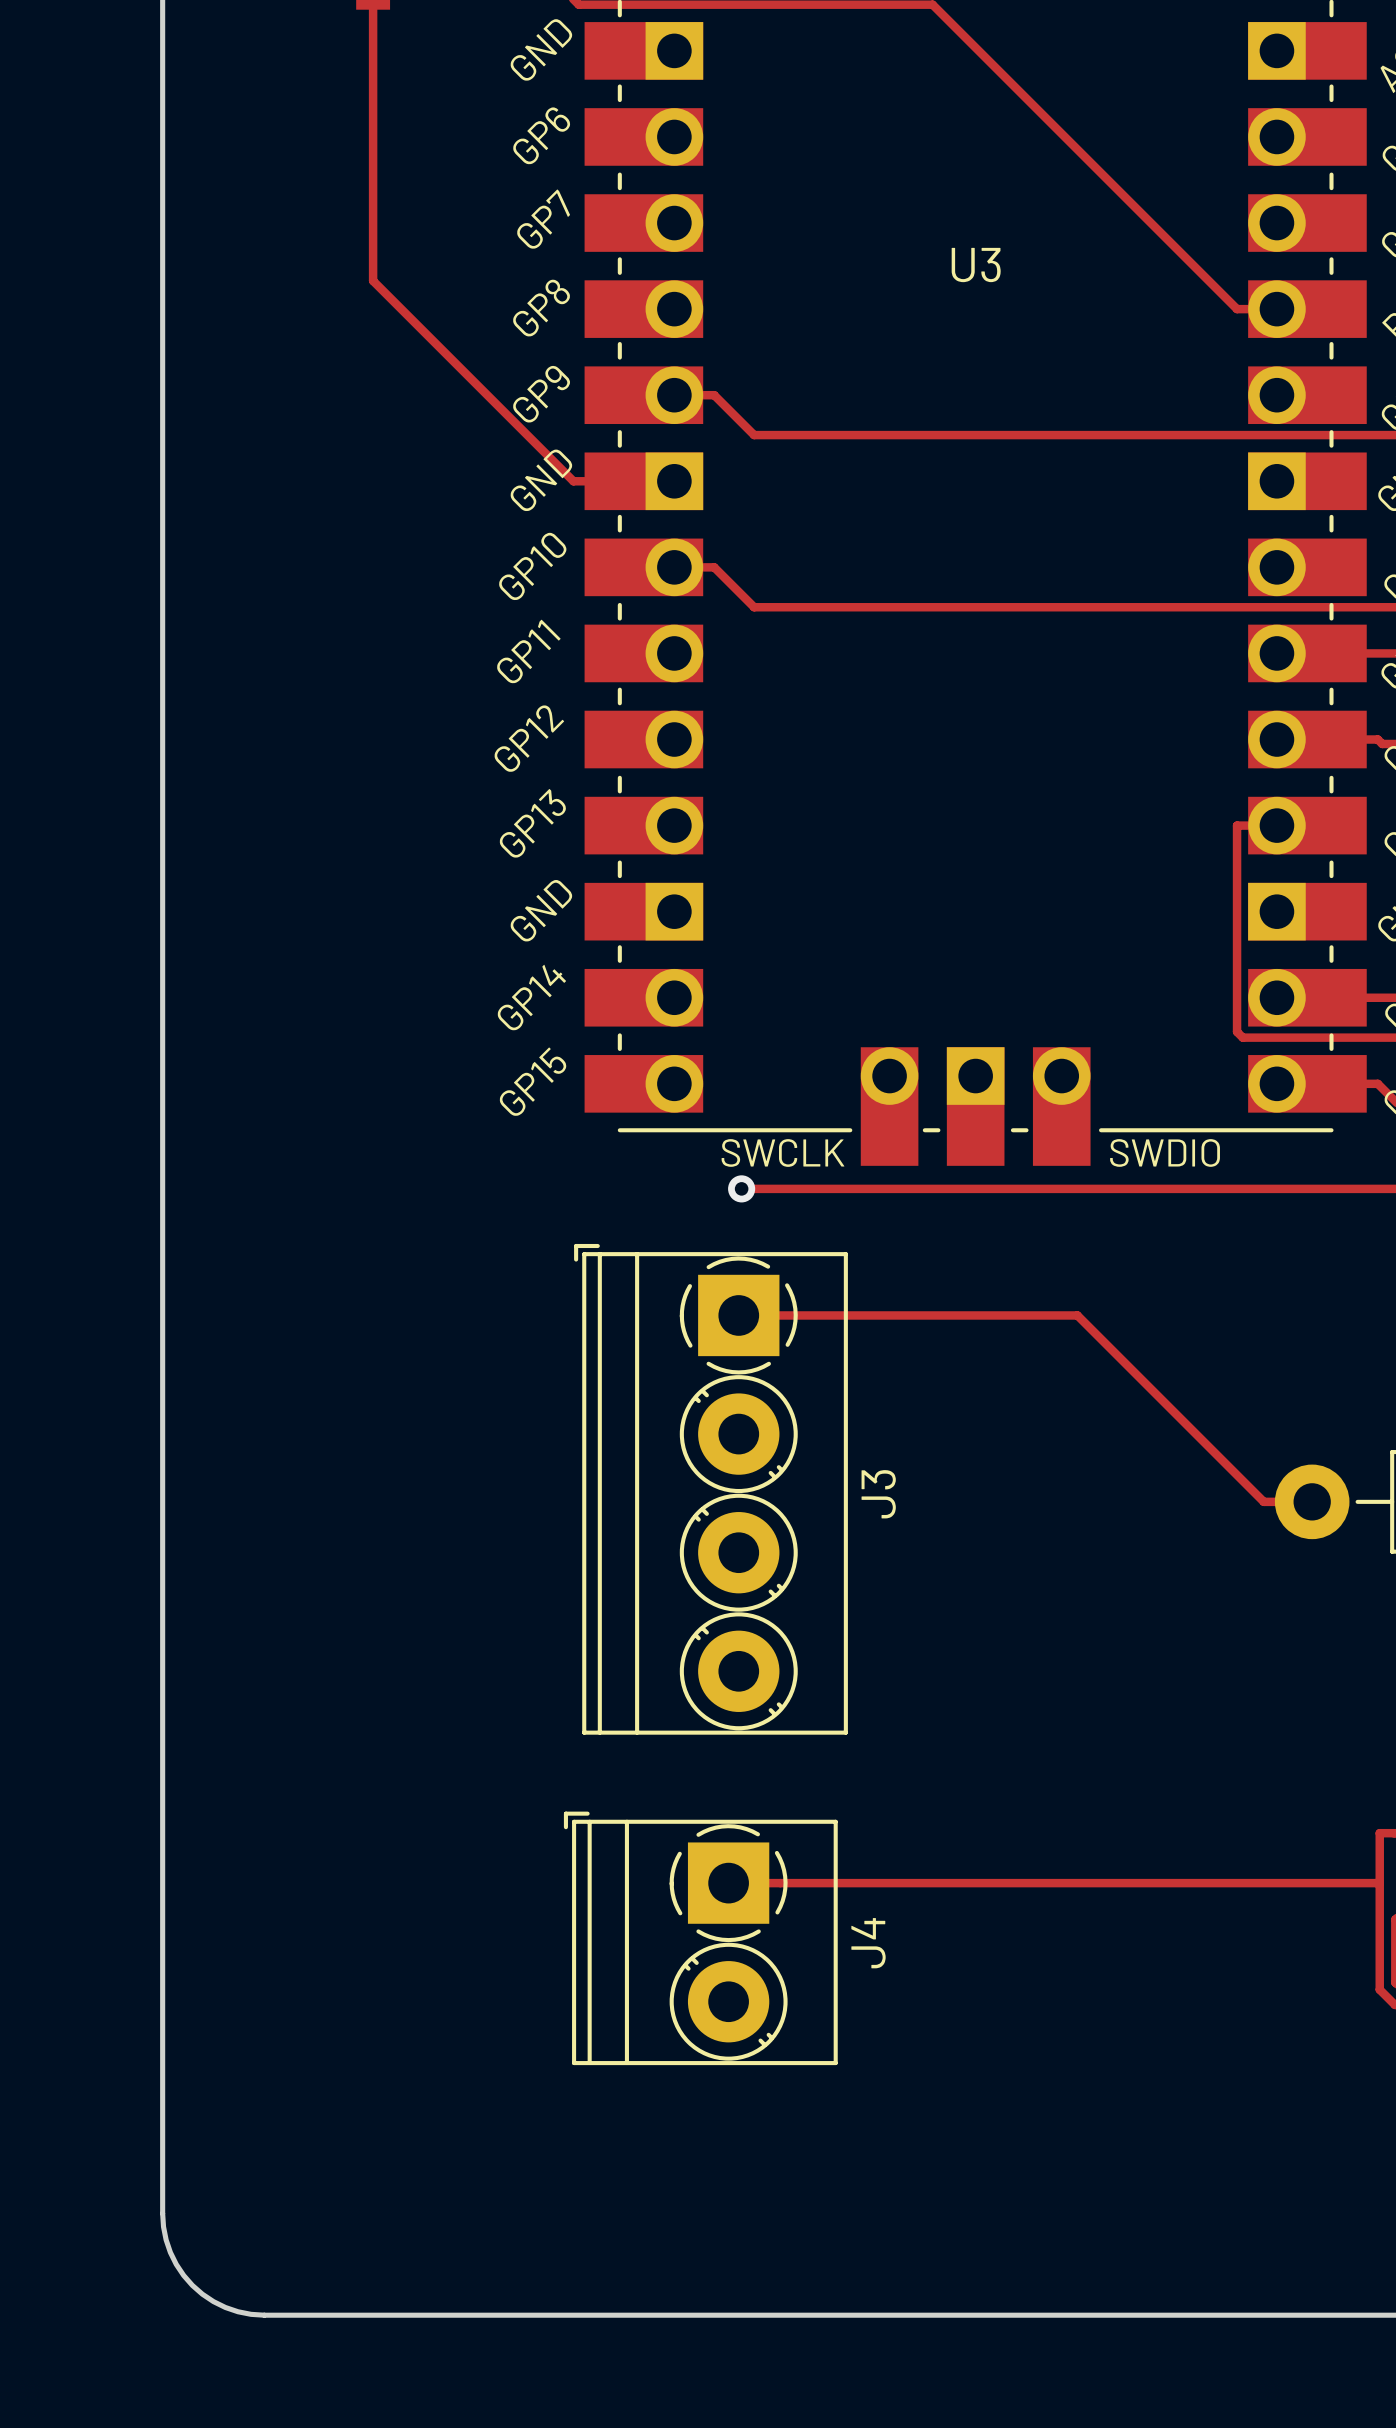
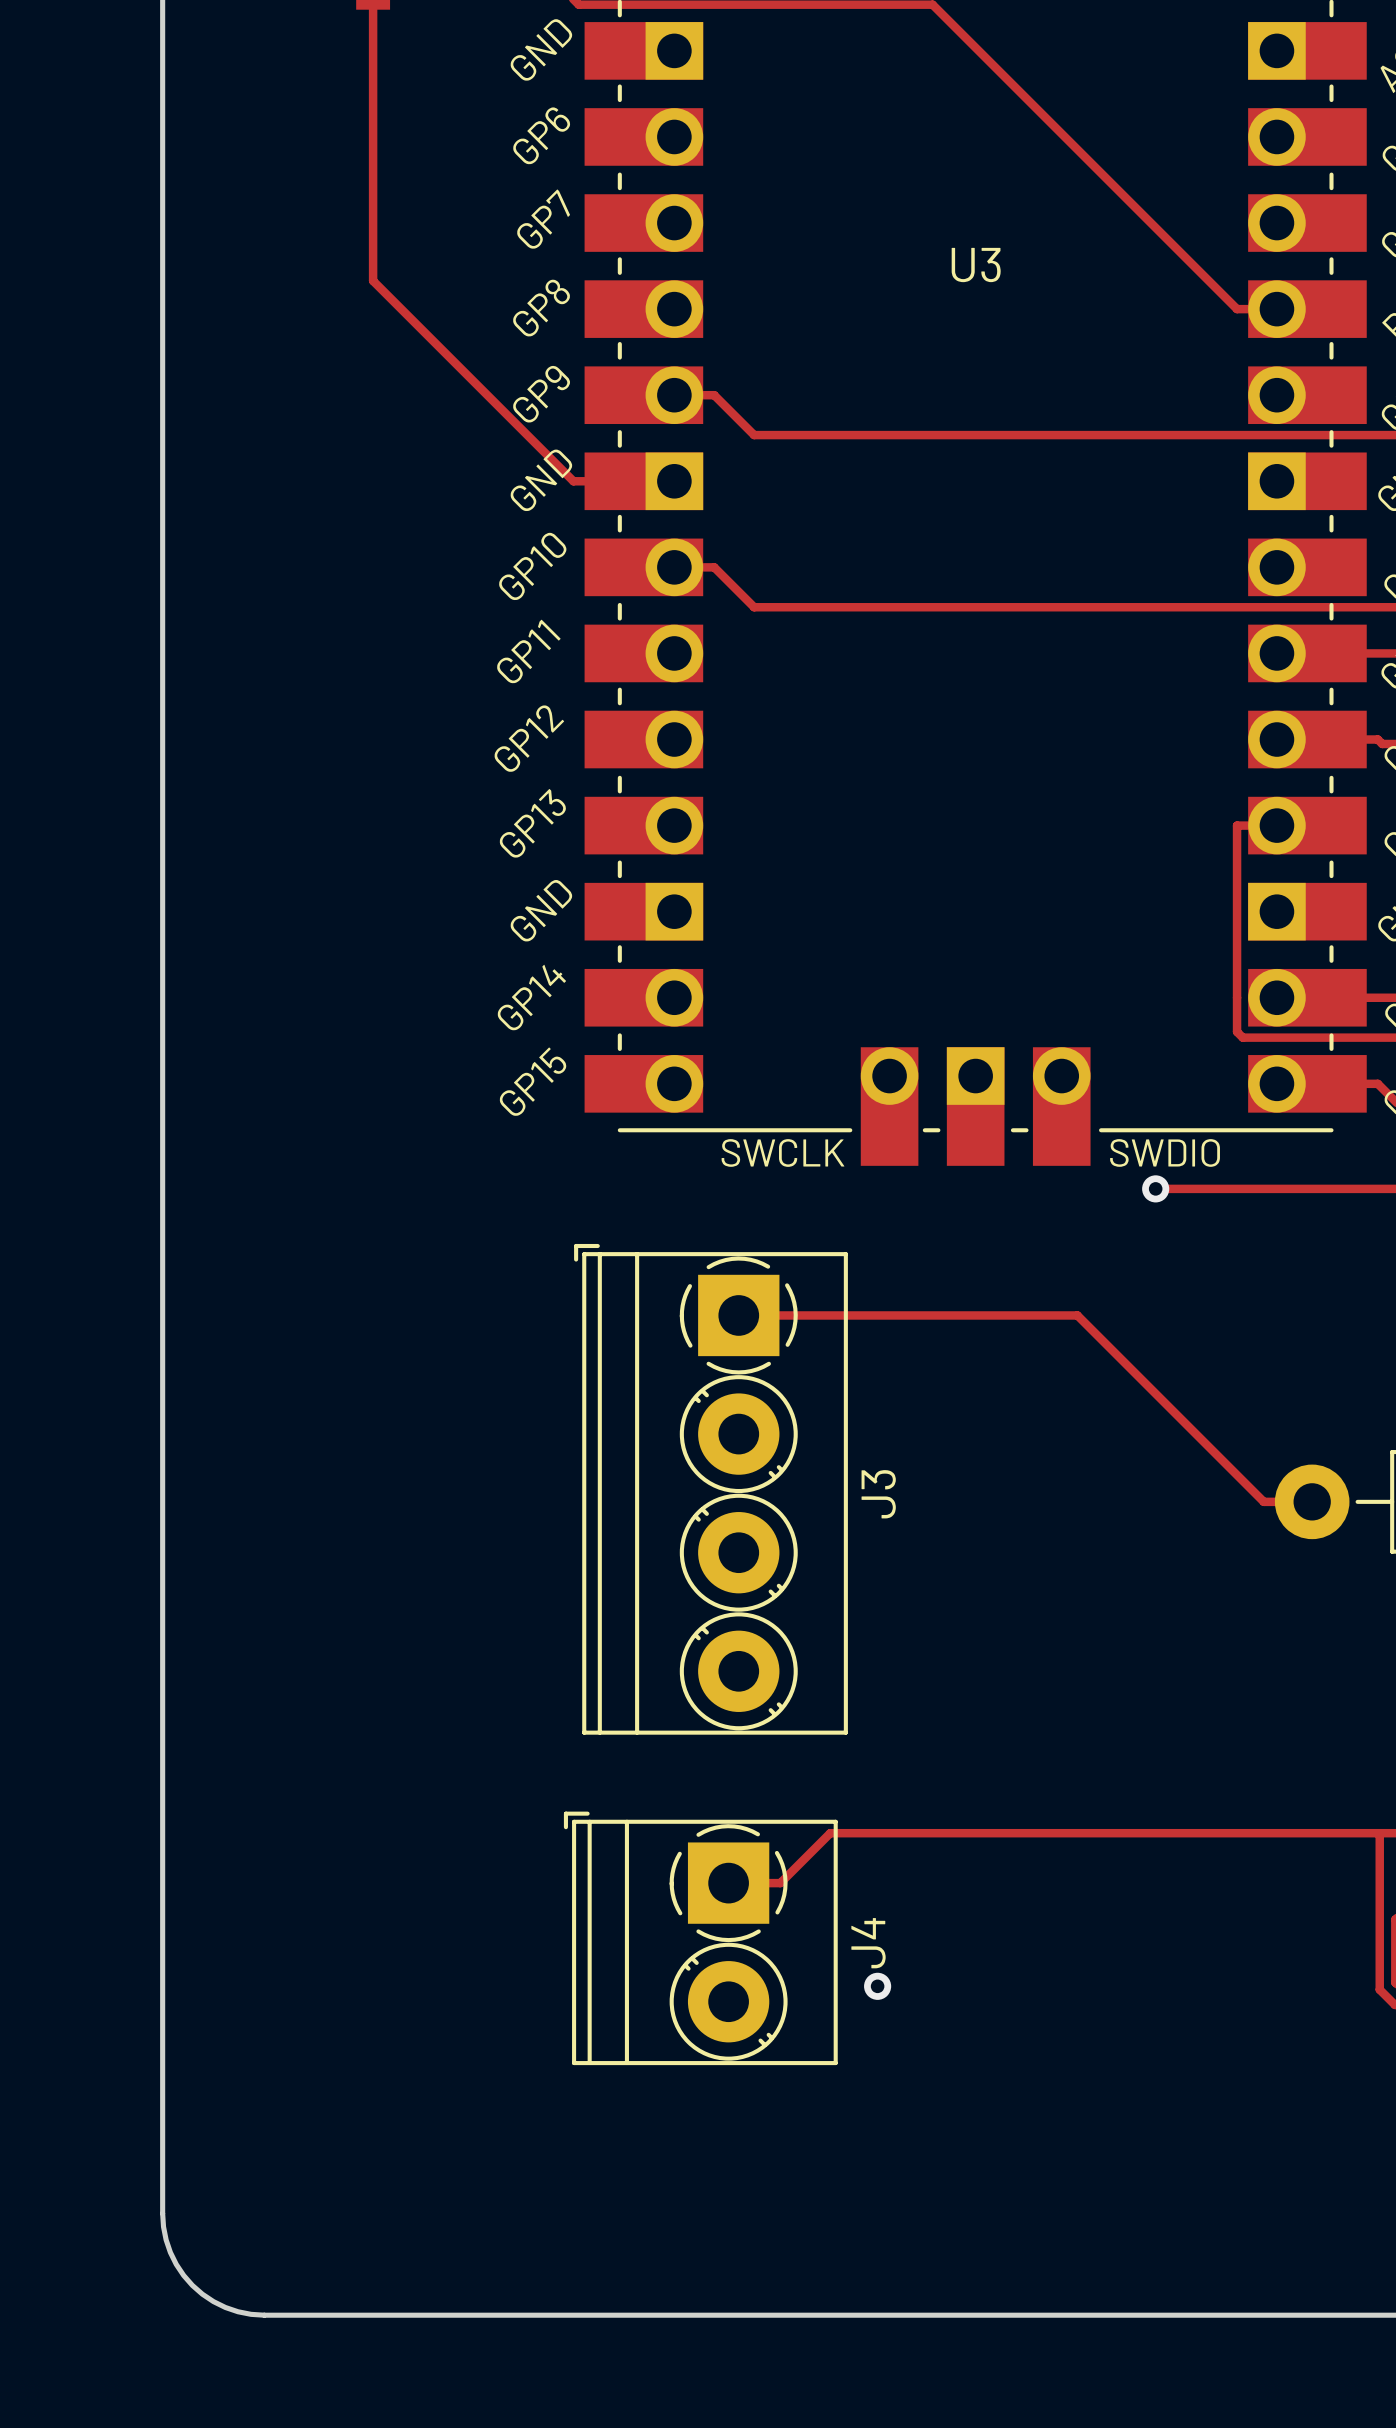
track: (741, 1188) (1155, 1188) -> none
via: (741, 1188) -> none
via: none -> (1155, 1188)
track: (780, 1883) (1379, 1883) -> (780, 1883) (830, 1833) (1379, 1833)
via: none -> (877, 1986)

